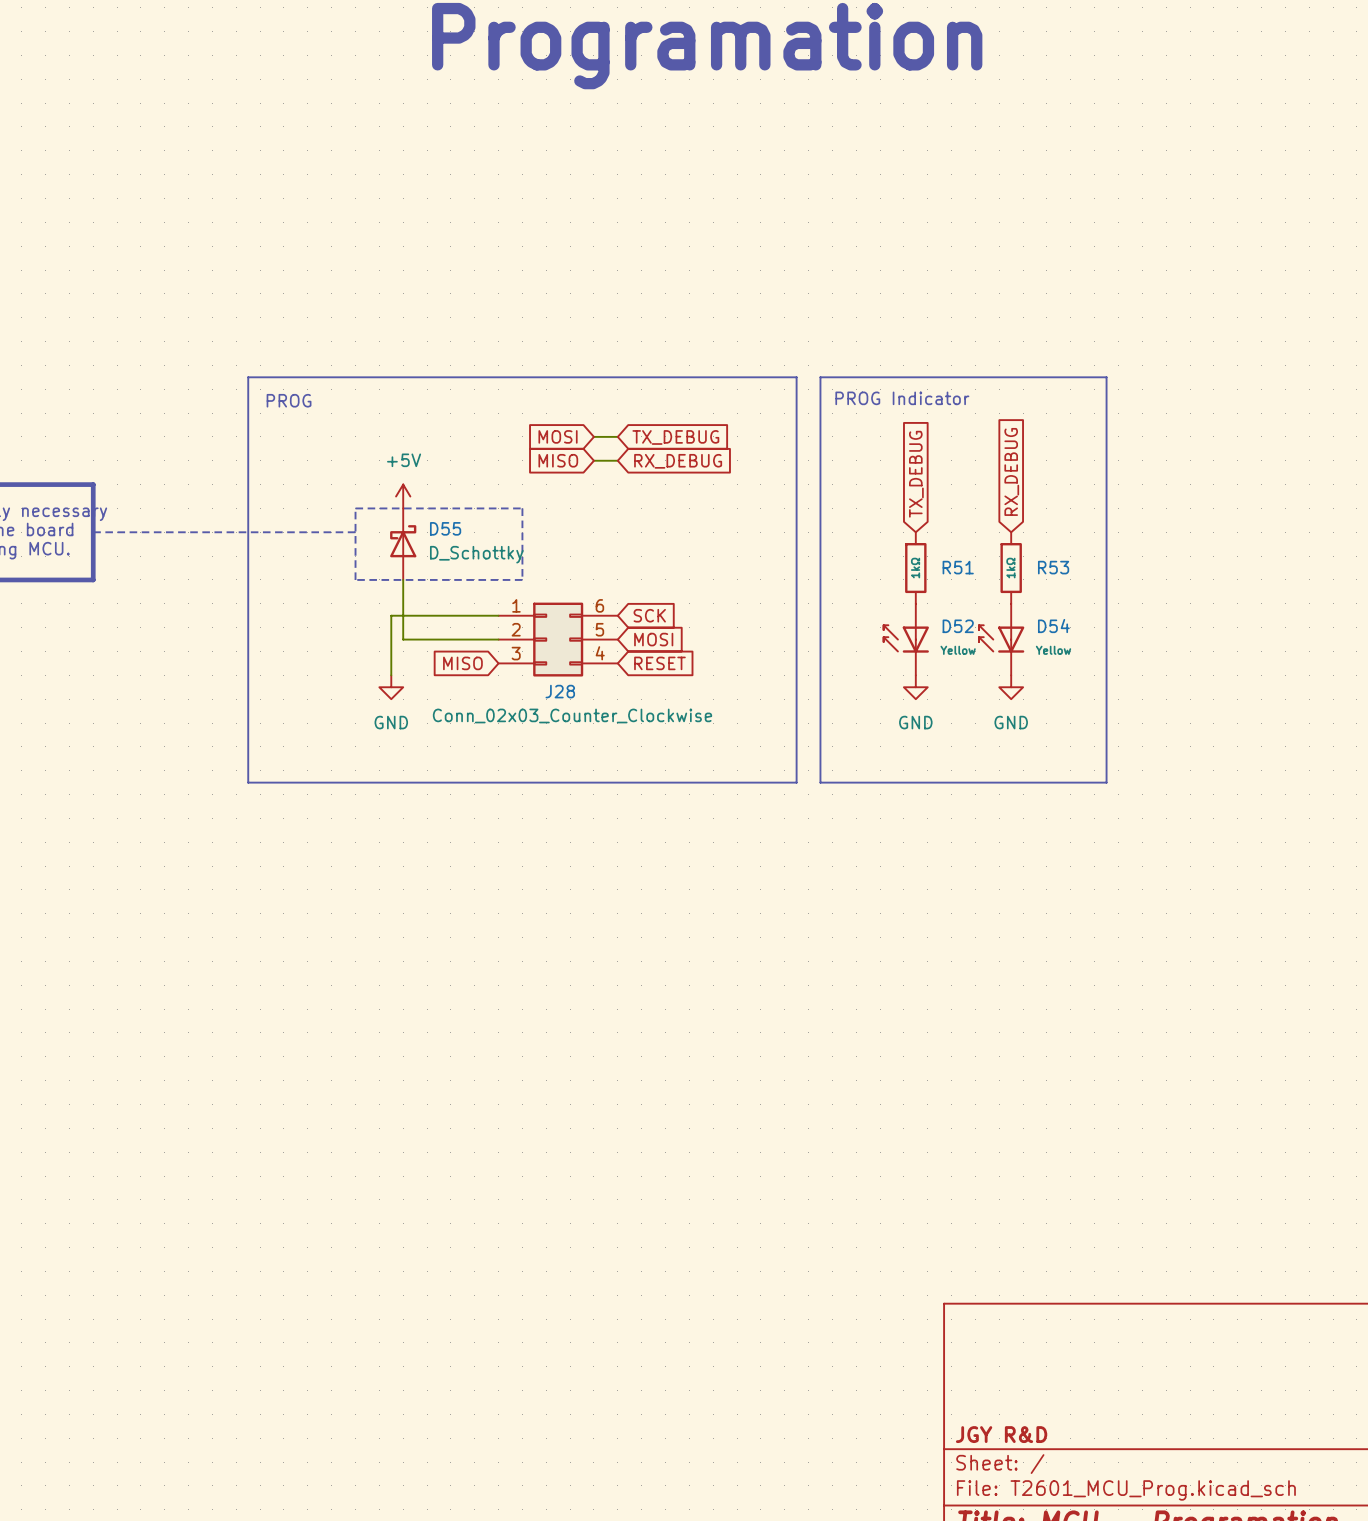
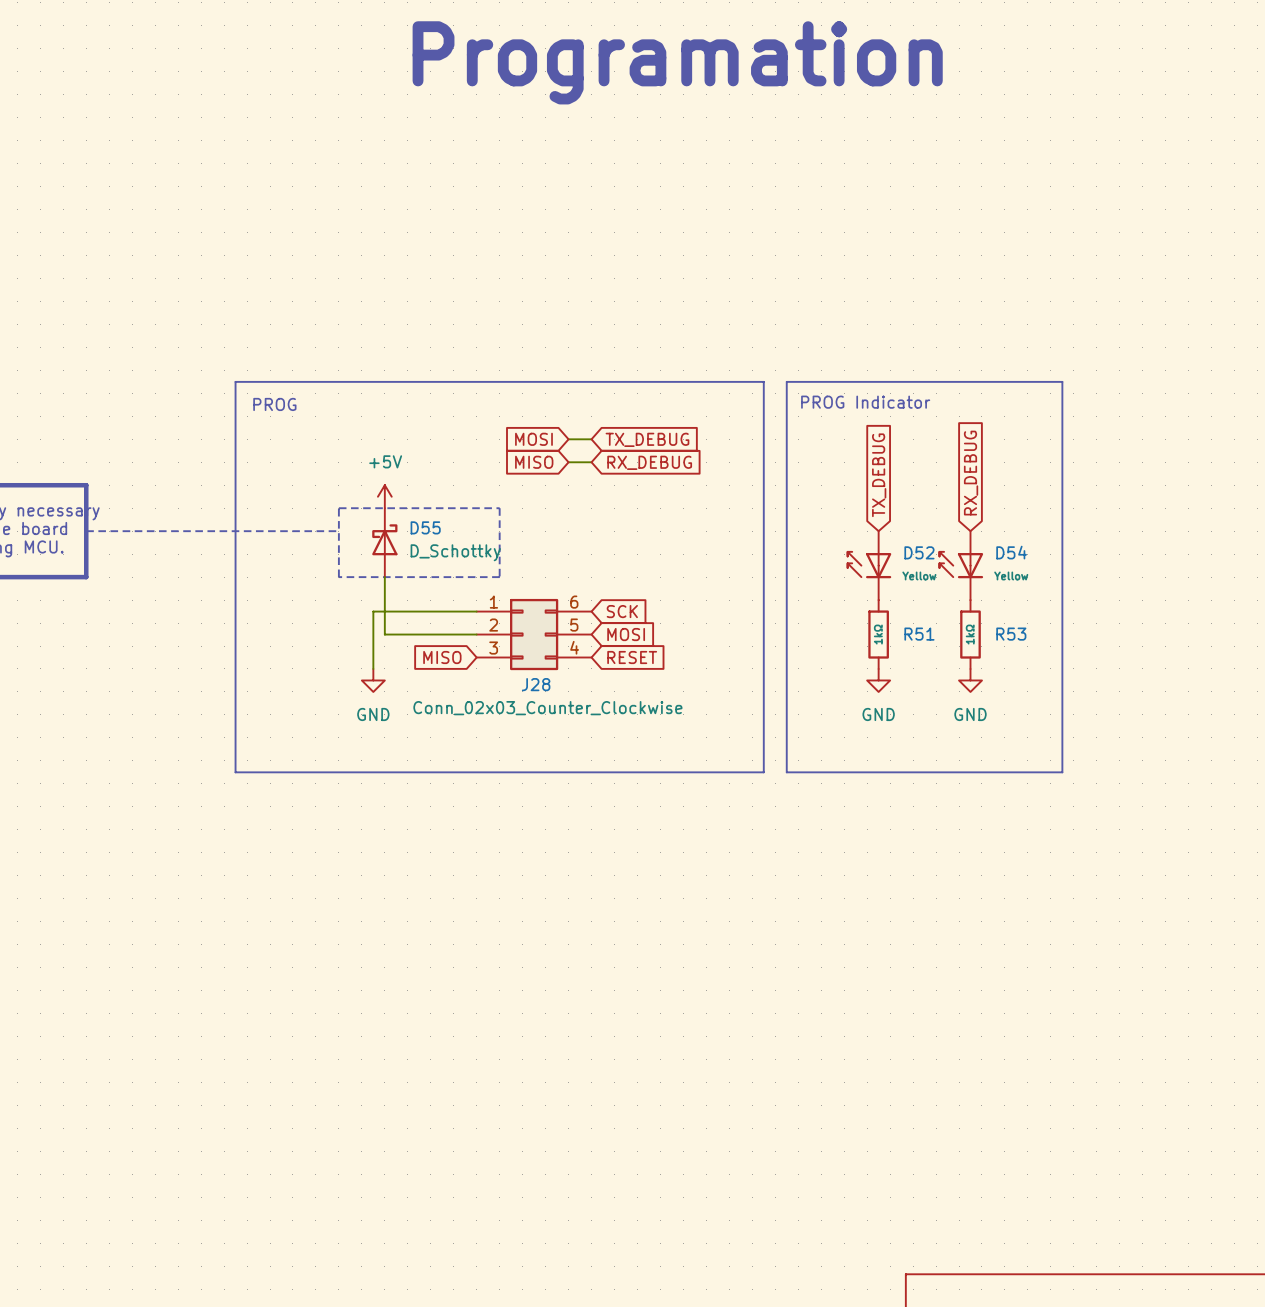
R51 position: (915, 568) -> (878, 634)
R53 position: (1011, 568) -> (970, 634)
D52 position: (905, 639) -> (869, 565)
D54 position: (1001, 639) -> (961, 565)

